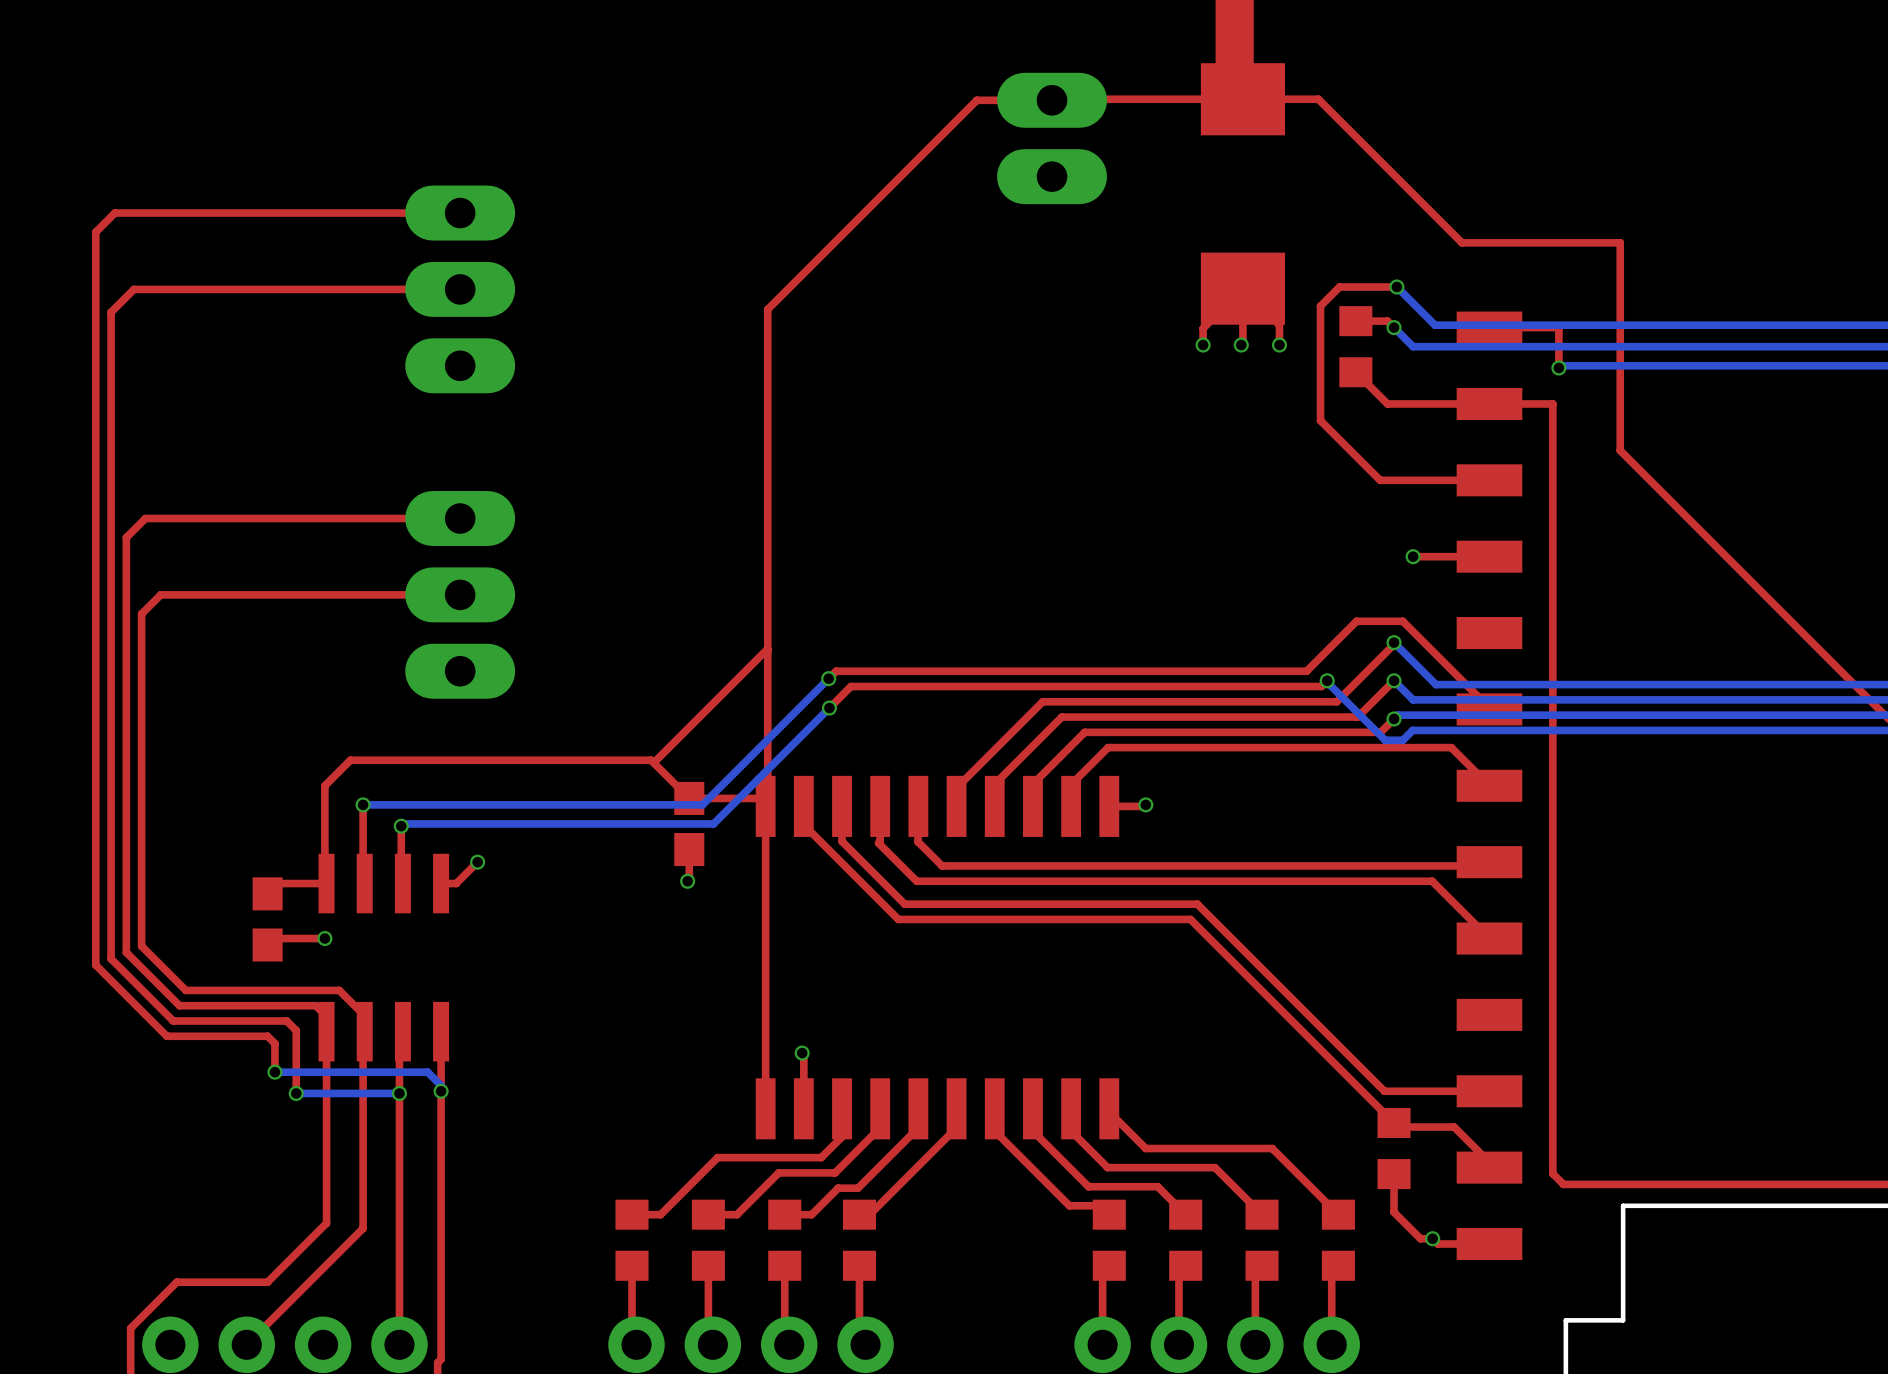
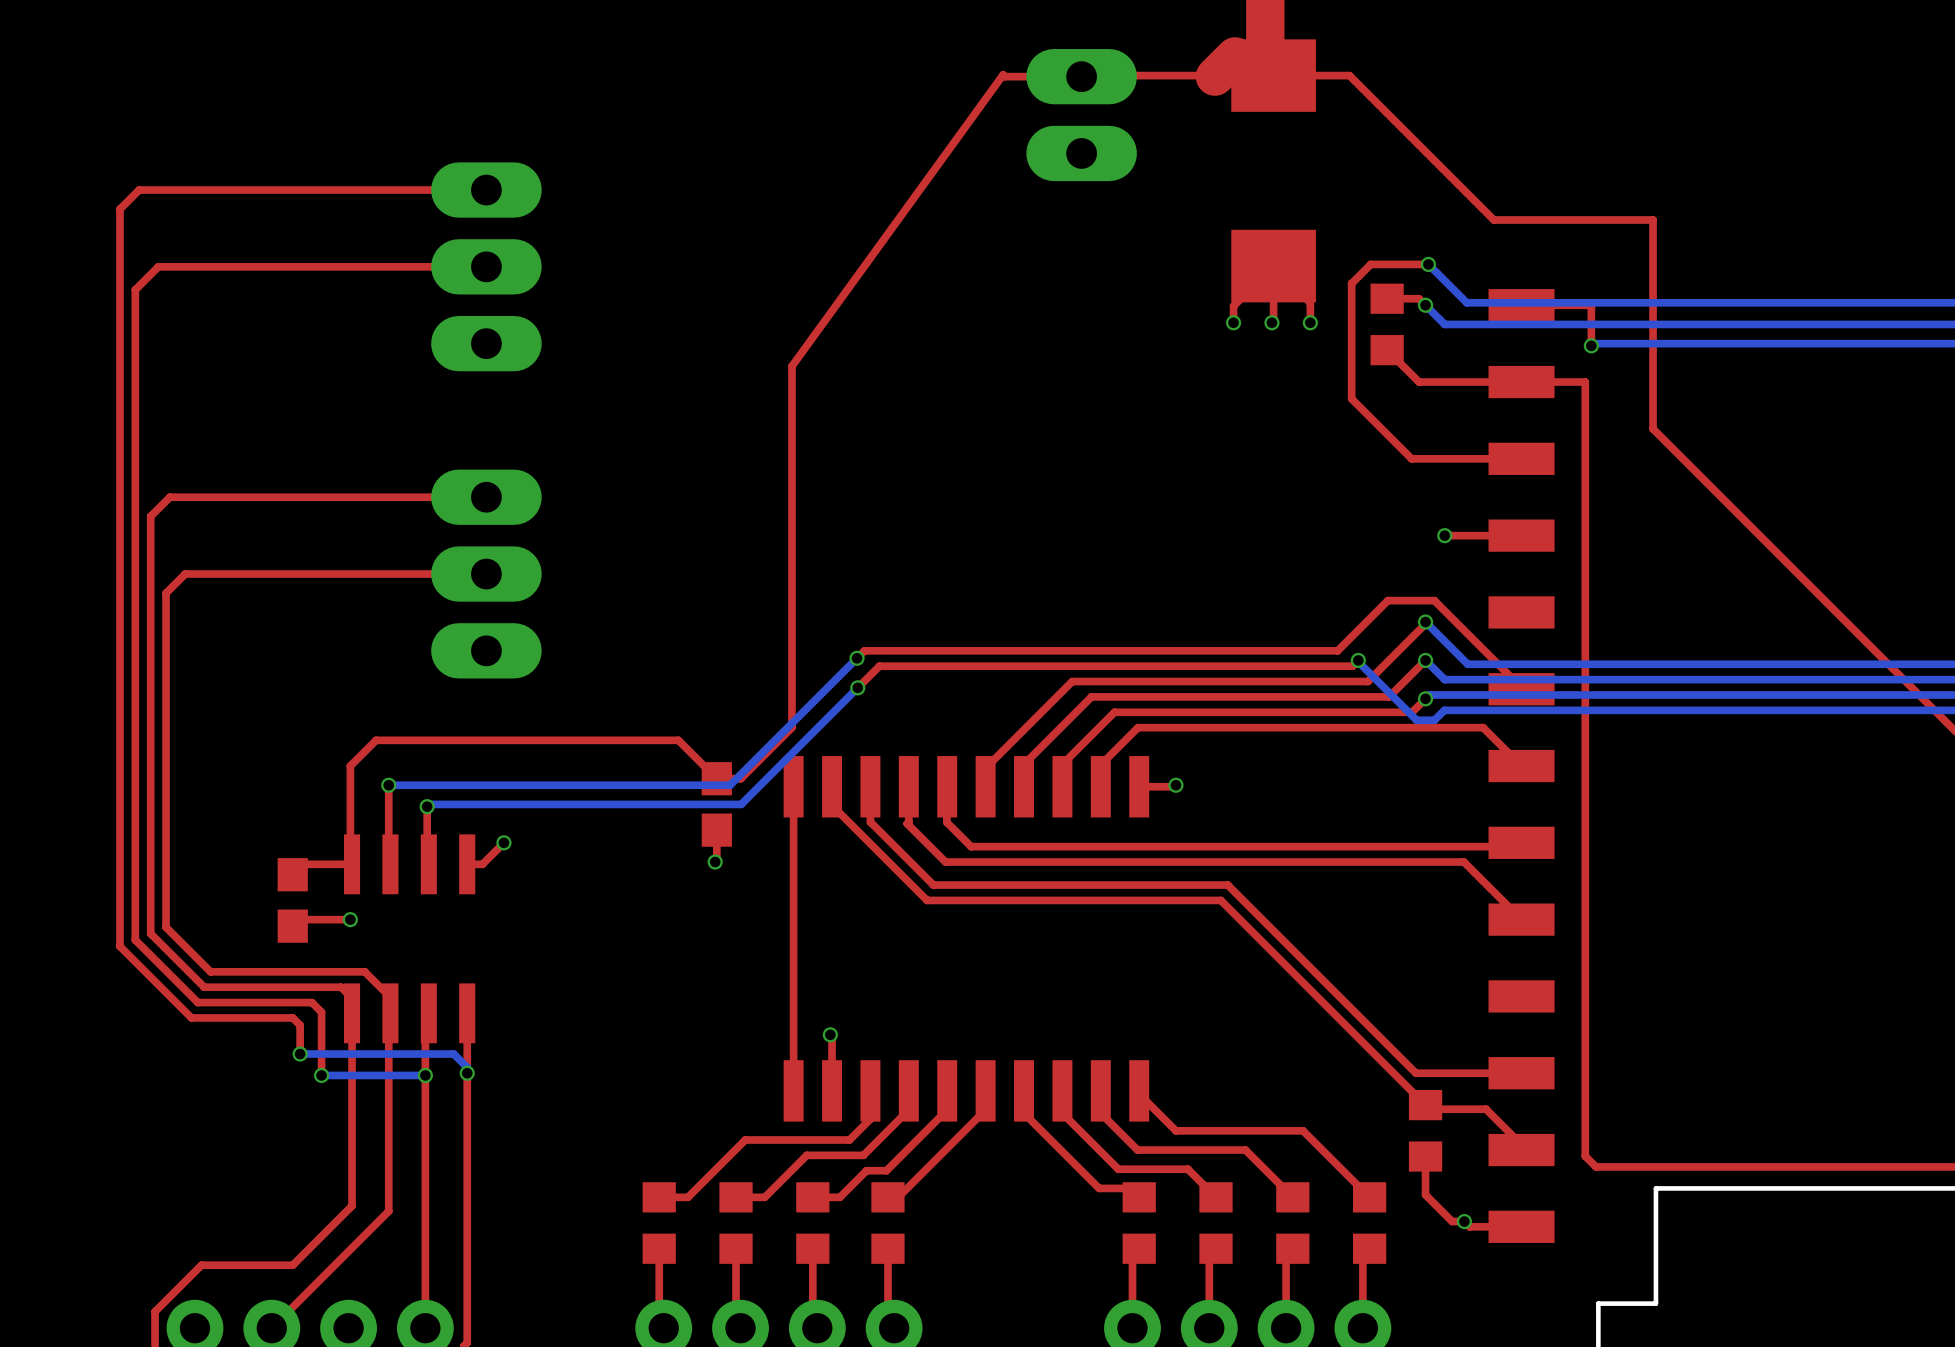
top track: none -> (1235, 56) (1214, 76)
top track: (976, 100) (767, 309) (767, 804) (765, 806) (757, 798) (713, 798) -> (1006, 76) (1003, 74) (791, 366) (791, 727) (740, 778)
top track: (767, 649) (653, 762) -> none

